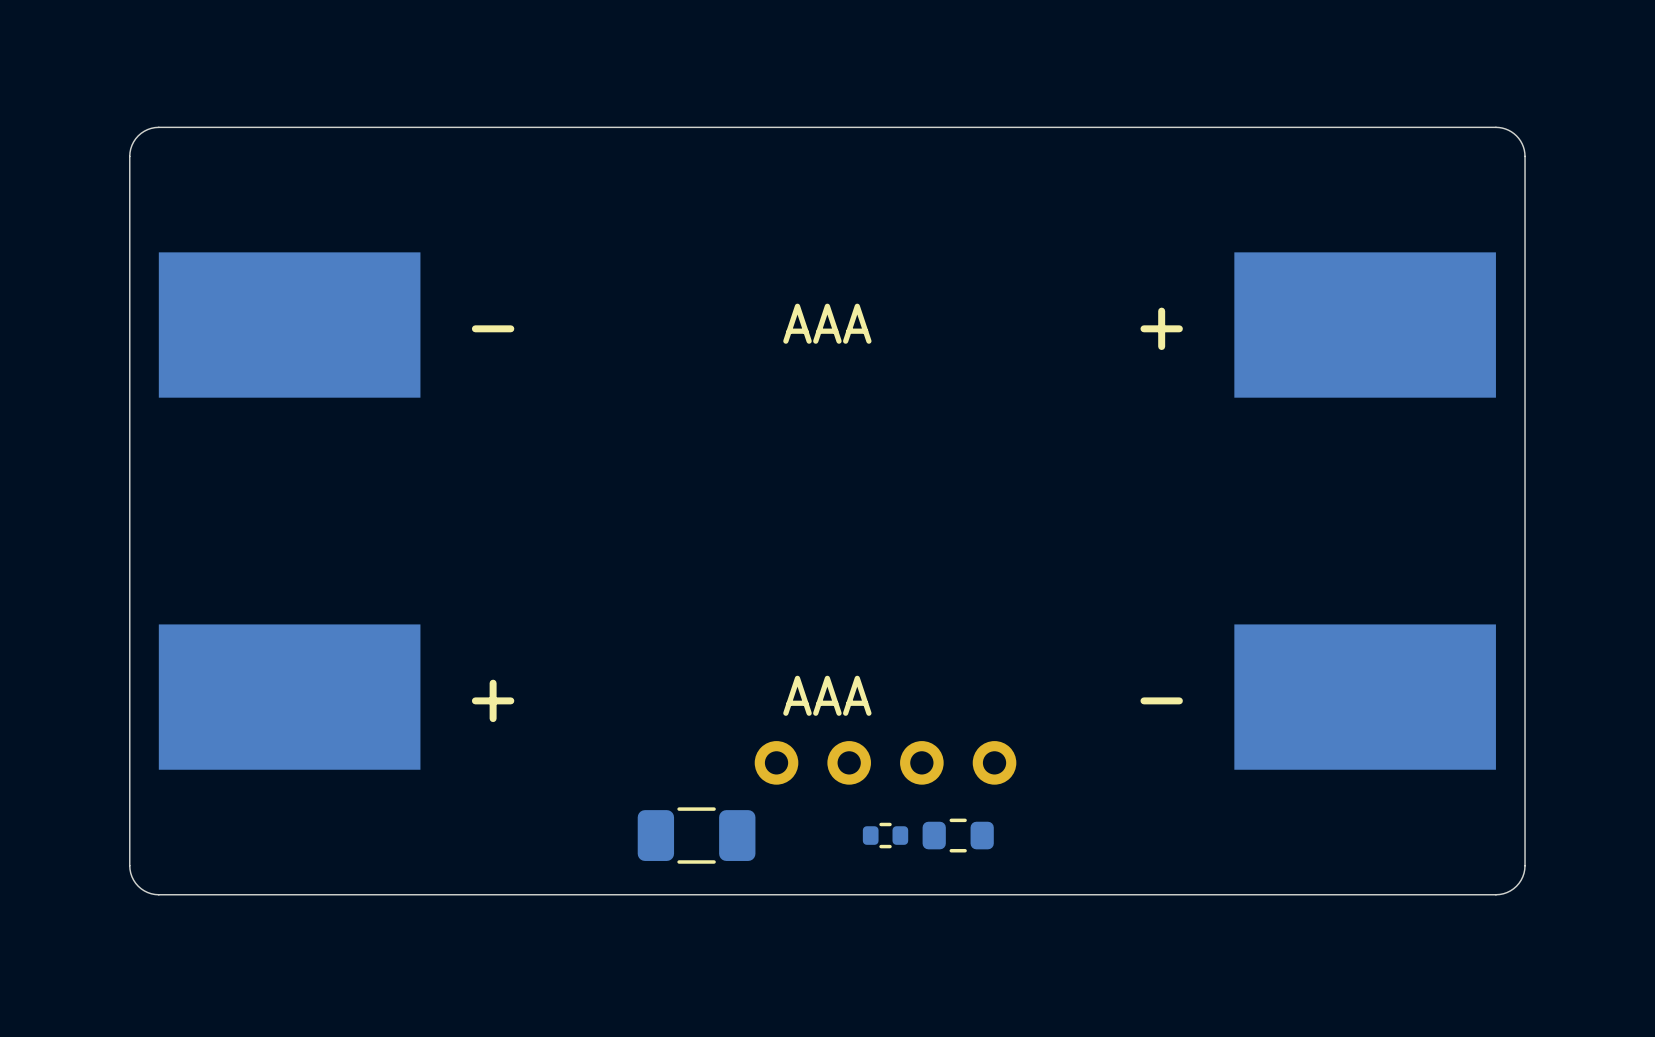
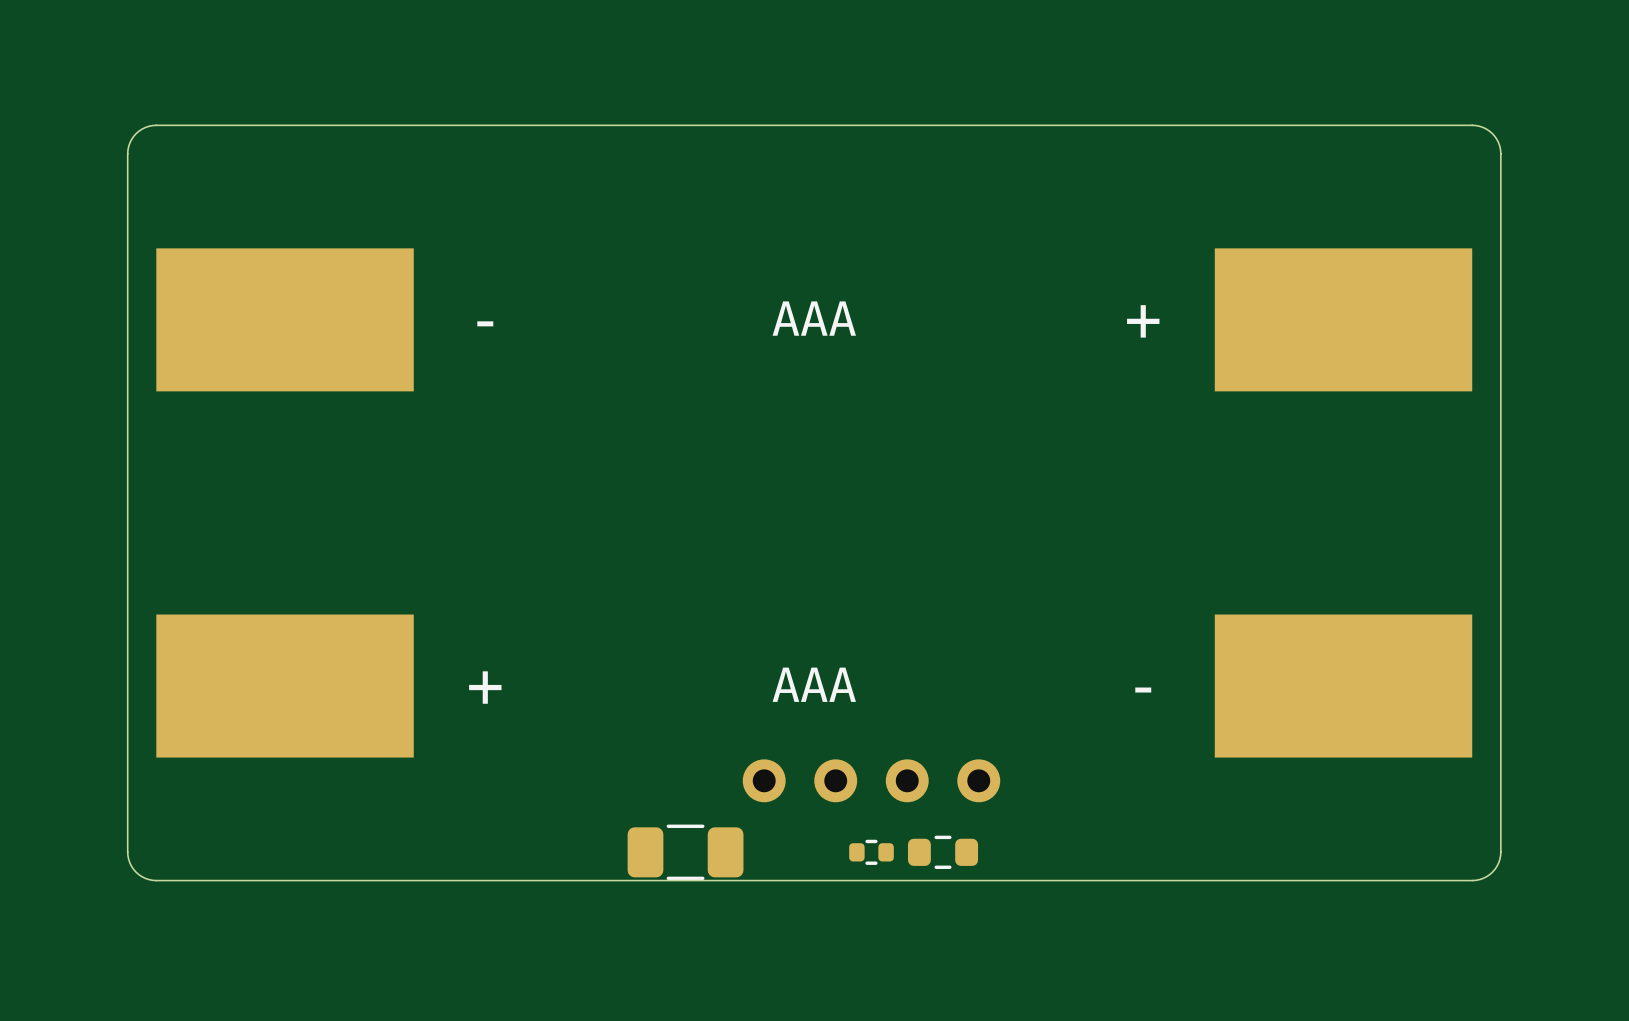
part position: (885, 762) -> (871, 780)
part position: (696, 835) -> (685, 852)
part position: (885, 835) -> (871, 852)
part position: (958, 835) -> (943, 852)

